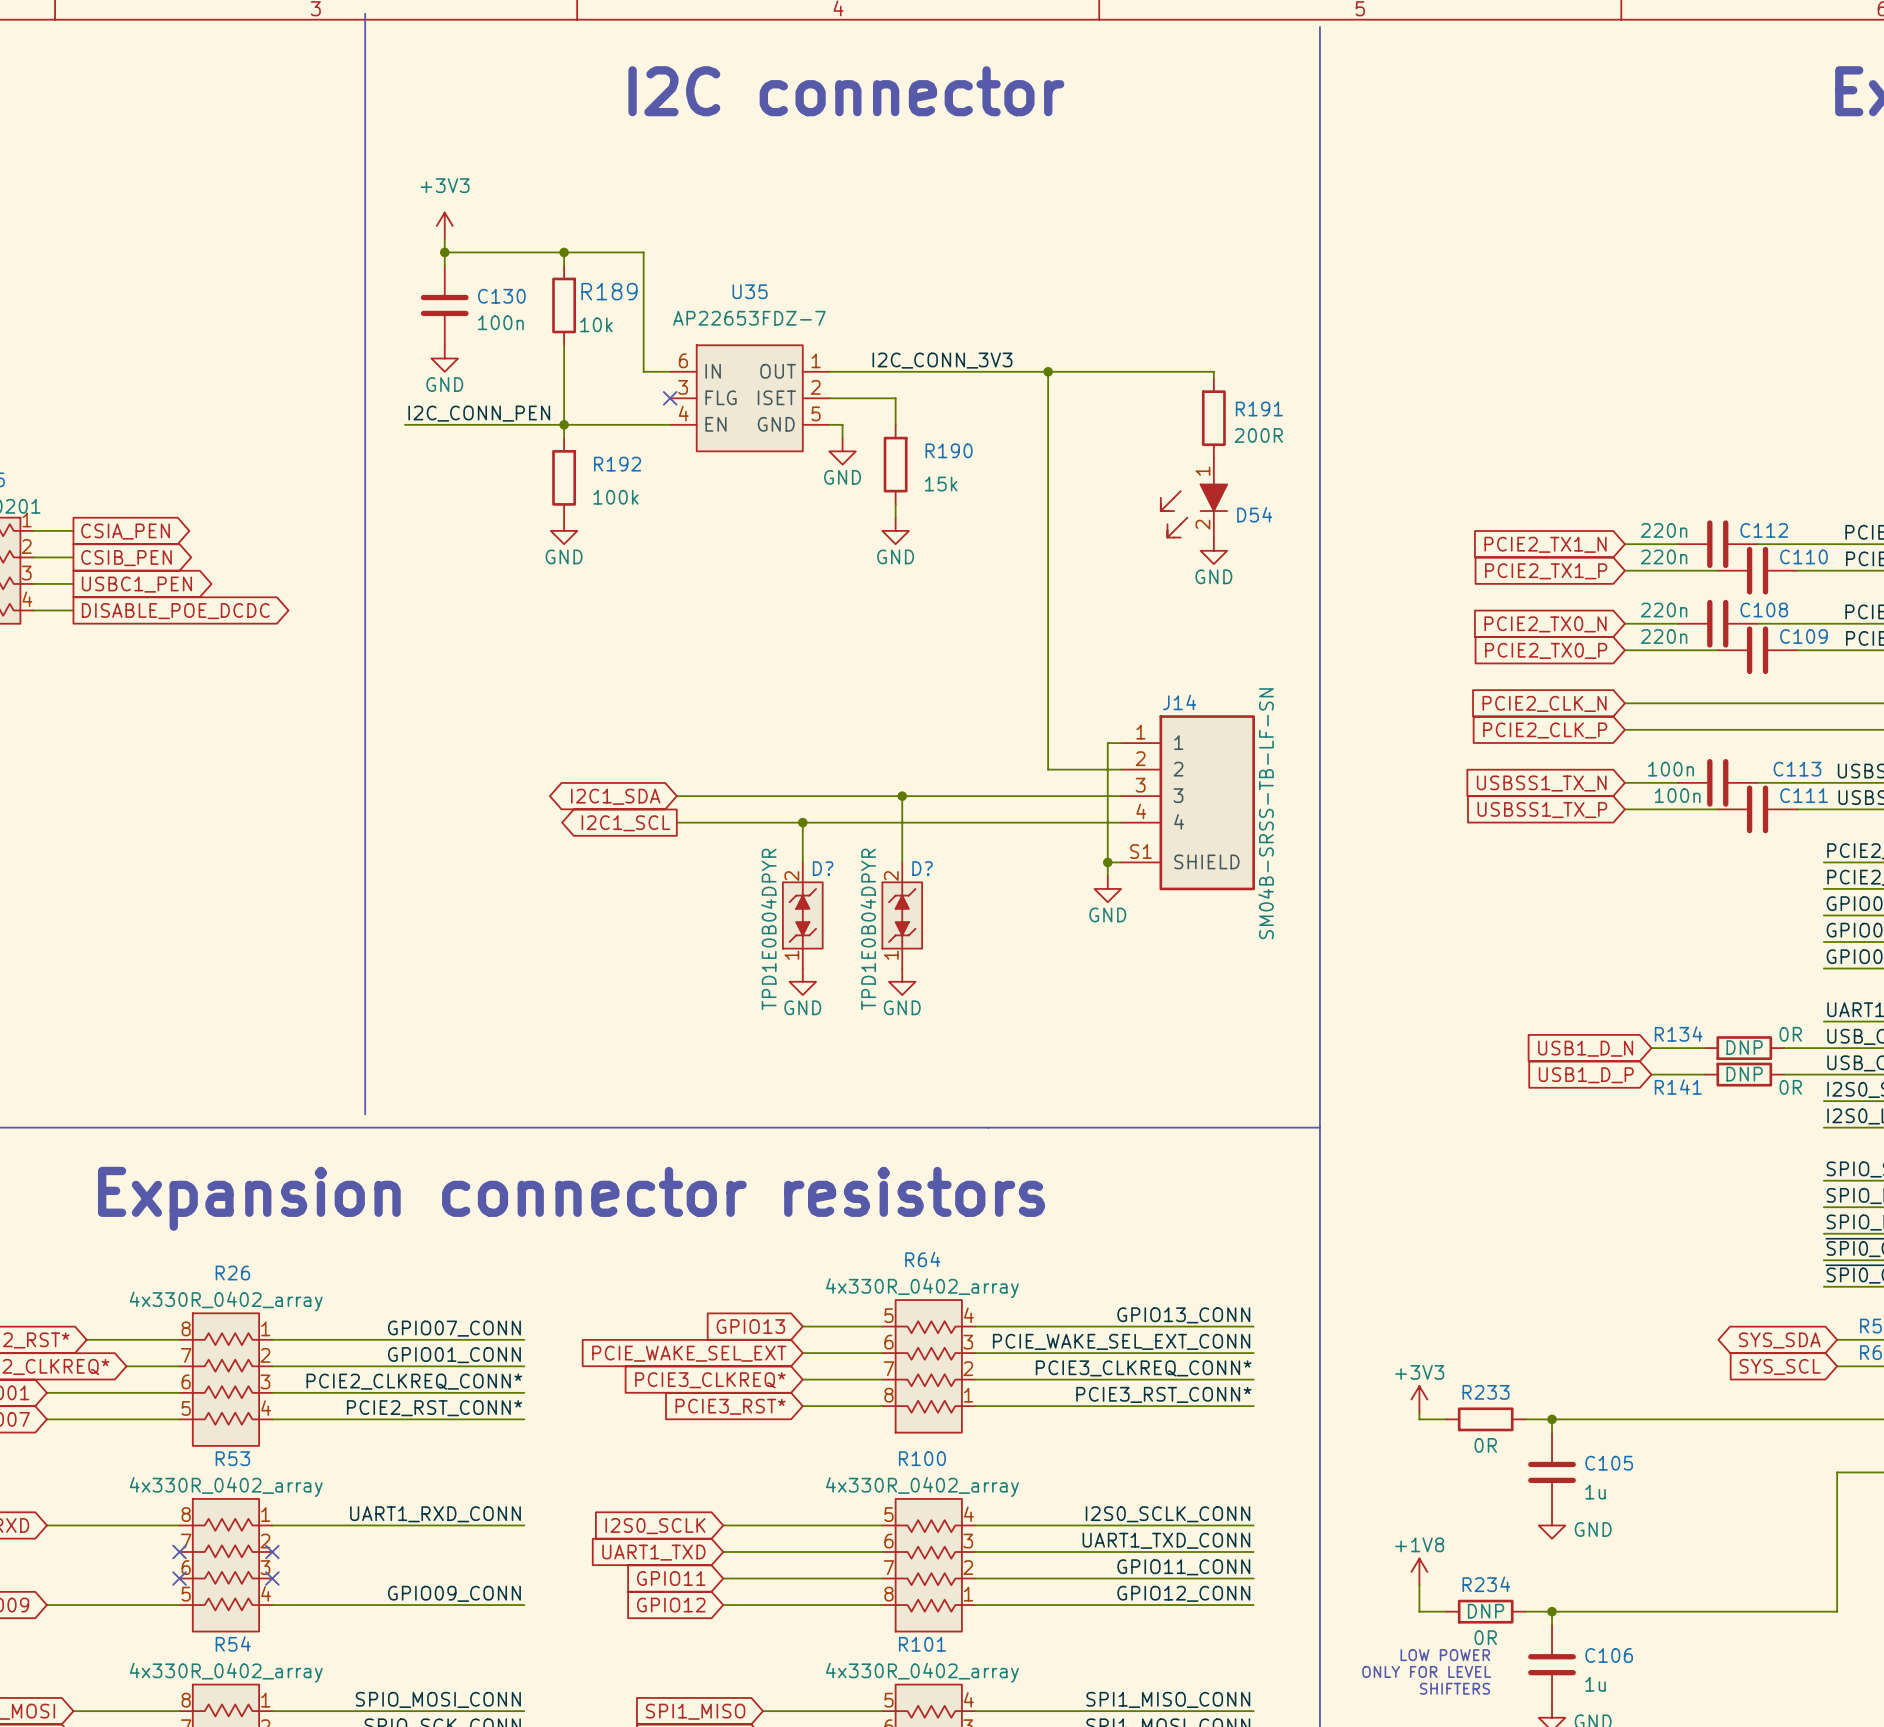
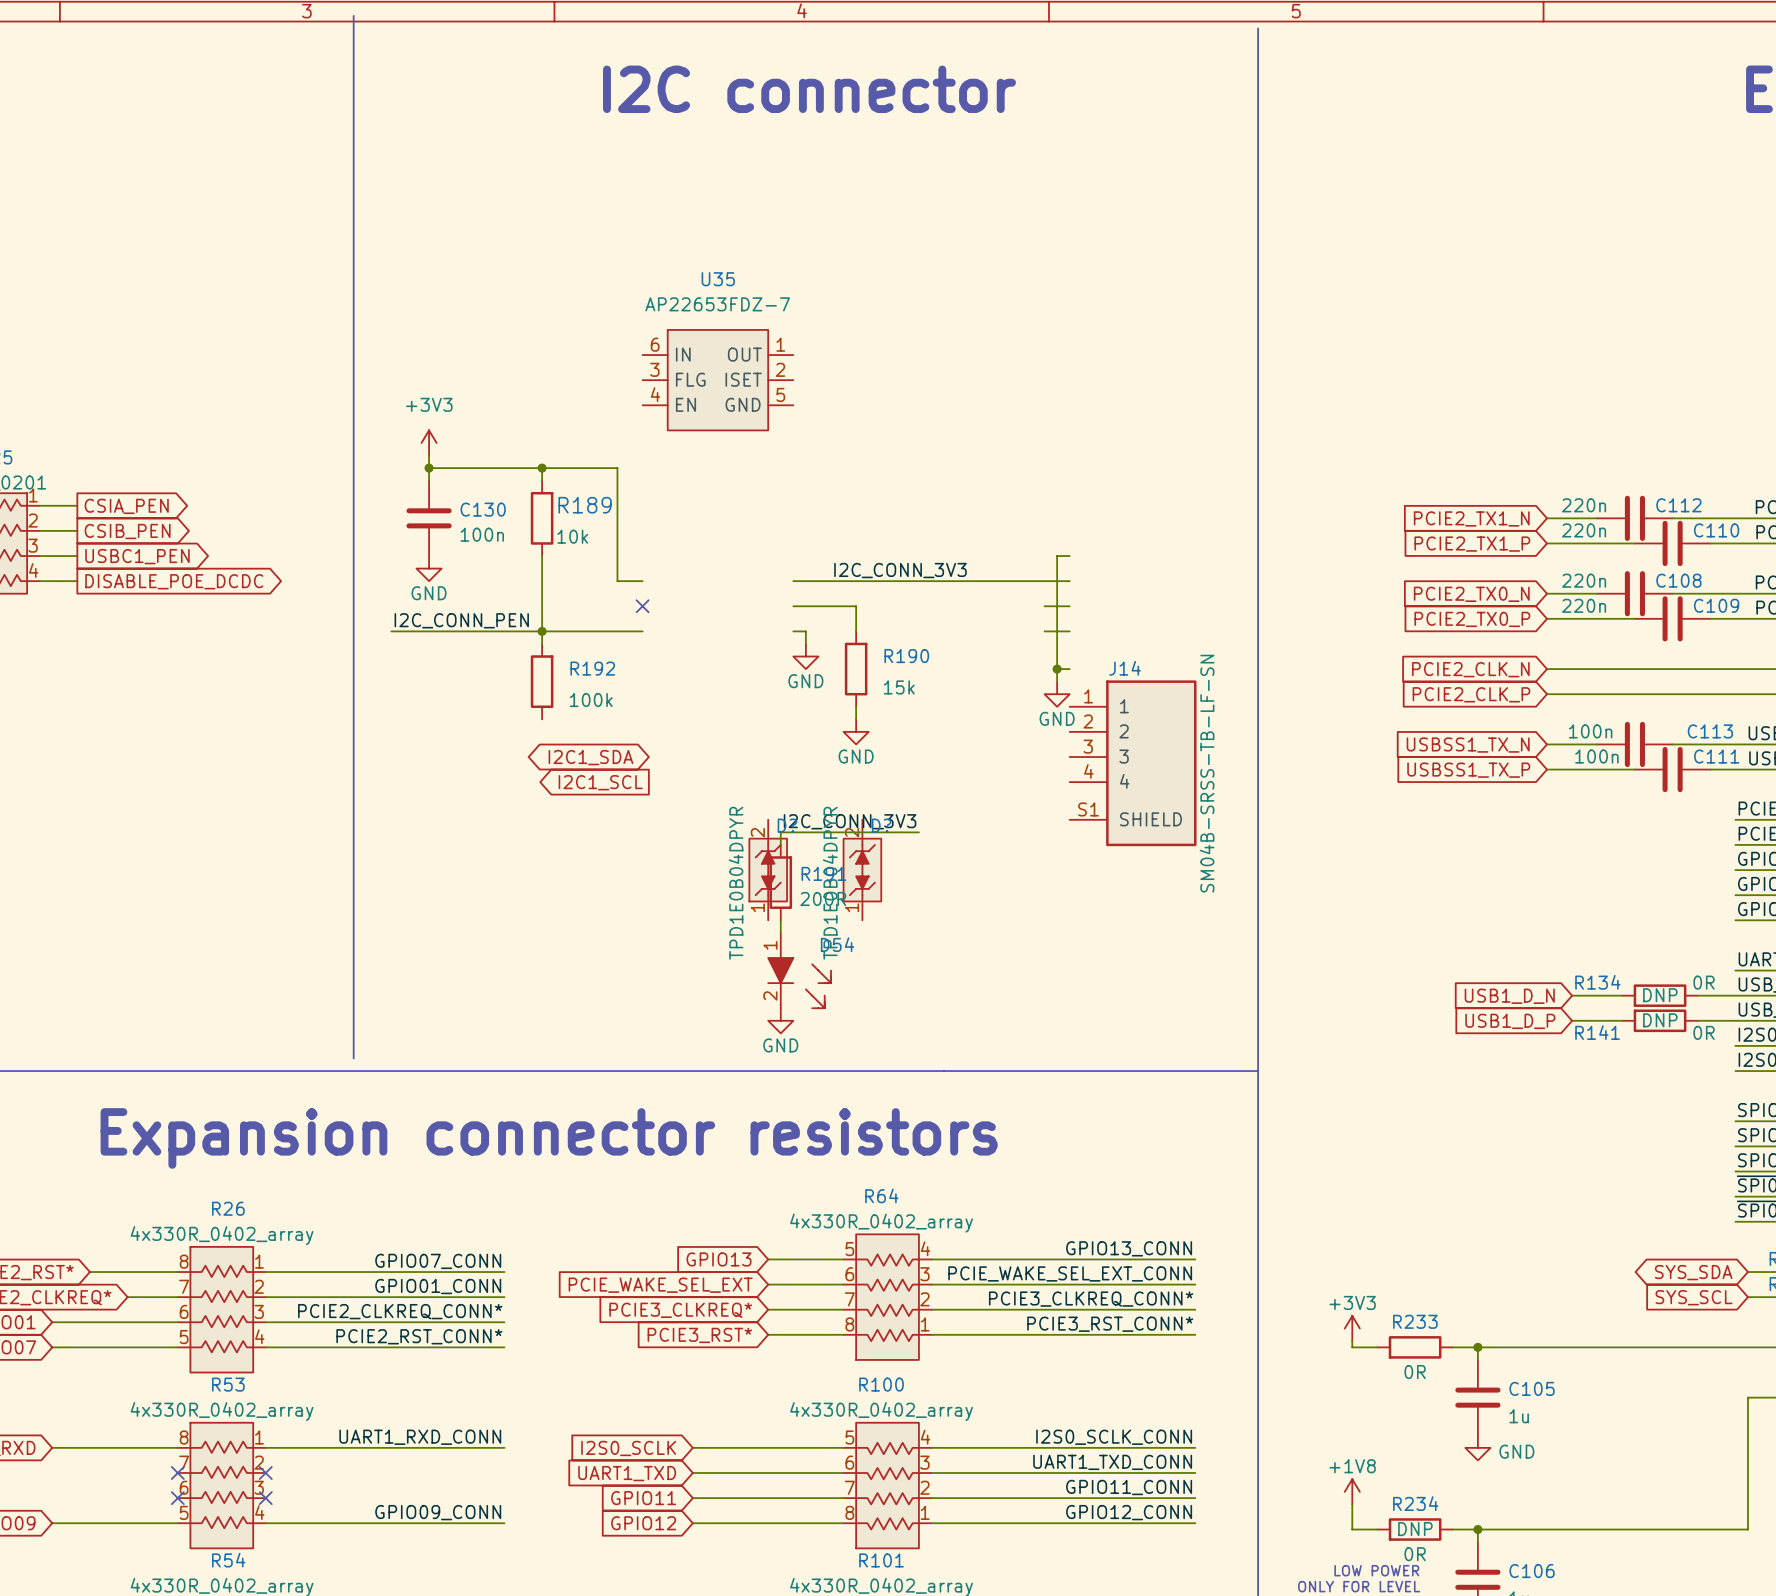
power symbol position: +3V3 (444, 225) -> +3V3 (429, 442)
wire: (444, 239) (444, 265) -> (429, 455) (429, 480)
wire: (444, 252) (643, 252) (643, 371) (670, 371) -> (429, 468) (617, 468) (617, 581) (642, 581)
junction: (444, 252) -> none
wire: (564, 252) (564, 265) -> (542, 468) (542, 480)
junction: (564, 252) -> none
C130 position: (444, 305) -> (429, 518)
R189 position: (564, 305) -> (542, 518)
wire: (564, 345) (564, 438) -> (542, 556) (542, 643)
power symbol: GND (444, 358) -> none
label position: I2C_CONN_3V3 (942, 360) -> I2C_CONN_3V3 (900, 570)
wire: (829, 371) (1213, 371) (1213, 378) -> none
wire: (1048, 371) (1048, 769) (1121, 769) -> none
junction: (1048, 371) -> none
no-connect mark: (670, 398) -> none
wire: (829, 398) (895, 398) (895, 424) -> (793, 606) (856, 606) (856, 631)
label position: I2C_CONN_PEN (479, 413) -> I2C_CONN_PEN (461, 620)
R191 position: (1213, 418) -> (780, 882)
wire: (404, 424) (670, 424) -> (391, 631) (642, 631)
junction: (564, 424) -> none
wire: (829, 424) (842, 424) (842, 438) -> (793, 631) (805, 631) (805, 643)
power symbol: GND (842, 451) -> none
R190 position: (895, 464) -> (856, 669)
R192 position: (564, 477) -> (542, 681)
junction: none -> (429, 468)
junction: none -> (542, 468)
D54 position: (1193, 497) -> (799, 970)
wire: (895, 504) (895, 517) -> (856, 706) (856, 719)
D54 flip: as is (1193, 511) -> left-right (799, 983)
D54 name position: D54 (1254, 514) -> D54 (837, 944)
power symbol: GND (564, 530) -> none
power symbol: GND (895, 530) -> none
power symbol: GND (1213, 550) -> none
power symbol: none -> GND (429, 568)
wire: none -> (793, 581) (1069, 581)
no-connect mark: none -> (642, 606)
wire: none -> (1044, 606) (1069, 606)
junction: none -> (542, 631)
wire: none -> (1044, 631) (1069, 631)
power symbol: none -> GND (805, 656)
junction: none -> (1057, 669)
power symbol: none -> GND (1057, 694)
wire: (1121, 743) (1107, 743) (1107, 875) -> (1069, 556) (1057, 556) (1057, 681)
power symbol: none -> GND (856, 731)
wire: (676, 796) (1121, 796) -> none
wire: (902, 796) (902, 862) -> none
junction: (902, 796) -> none
wire: (676, 822) (1121, 822) -> none
wire: (802, 822) (802, 862) -> none
junction: (802, 822) -> none
wire: (1107, 862) (1121, 862) -> (1057, 669) (1069, 669)
junction: (1107, 862) -> none
label: none -> I2C_CONN_3V3 (850, 821)
wire: none -> (918, 832) (780, 832) (780, 844)
power symbol: GND (1107, 888) -> none
wire: none -> (780, 920) (780, 932)
power symbol: GND (802, 981) -> none
power symbol: GND (902, 981) -> none
power symbol: none -> GND (780, 1020)

